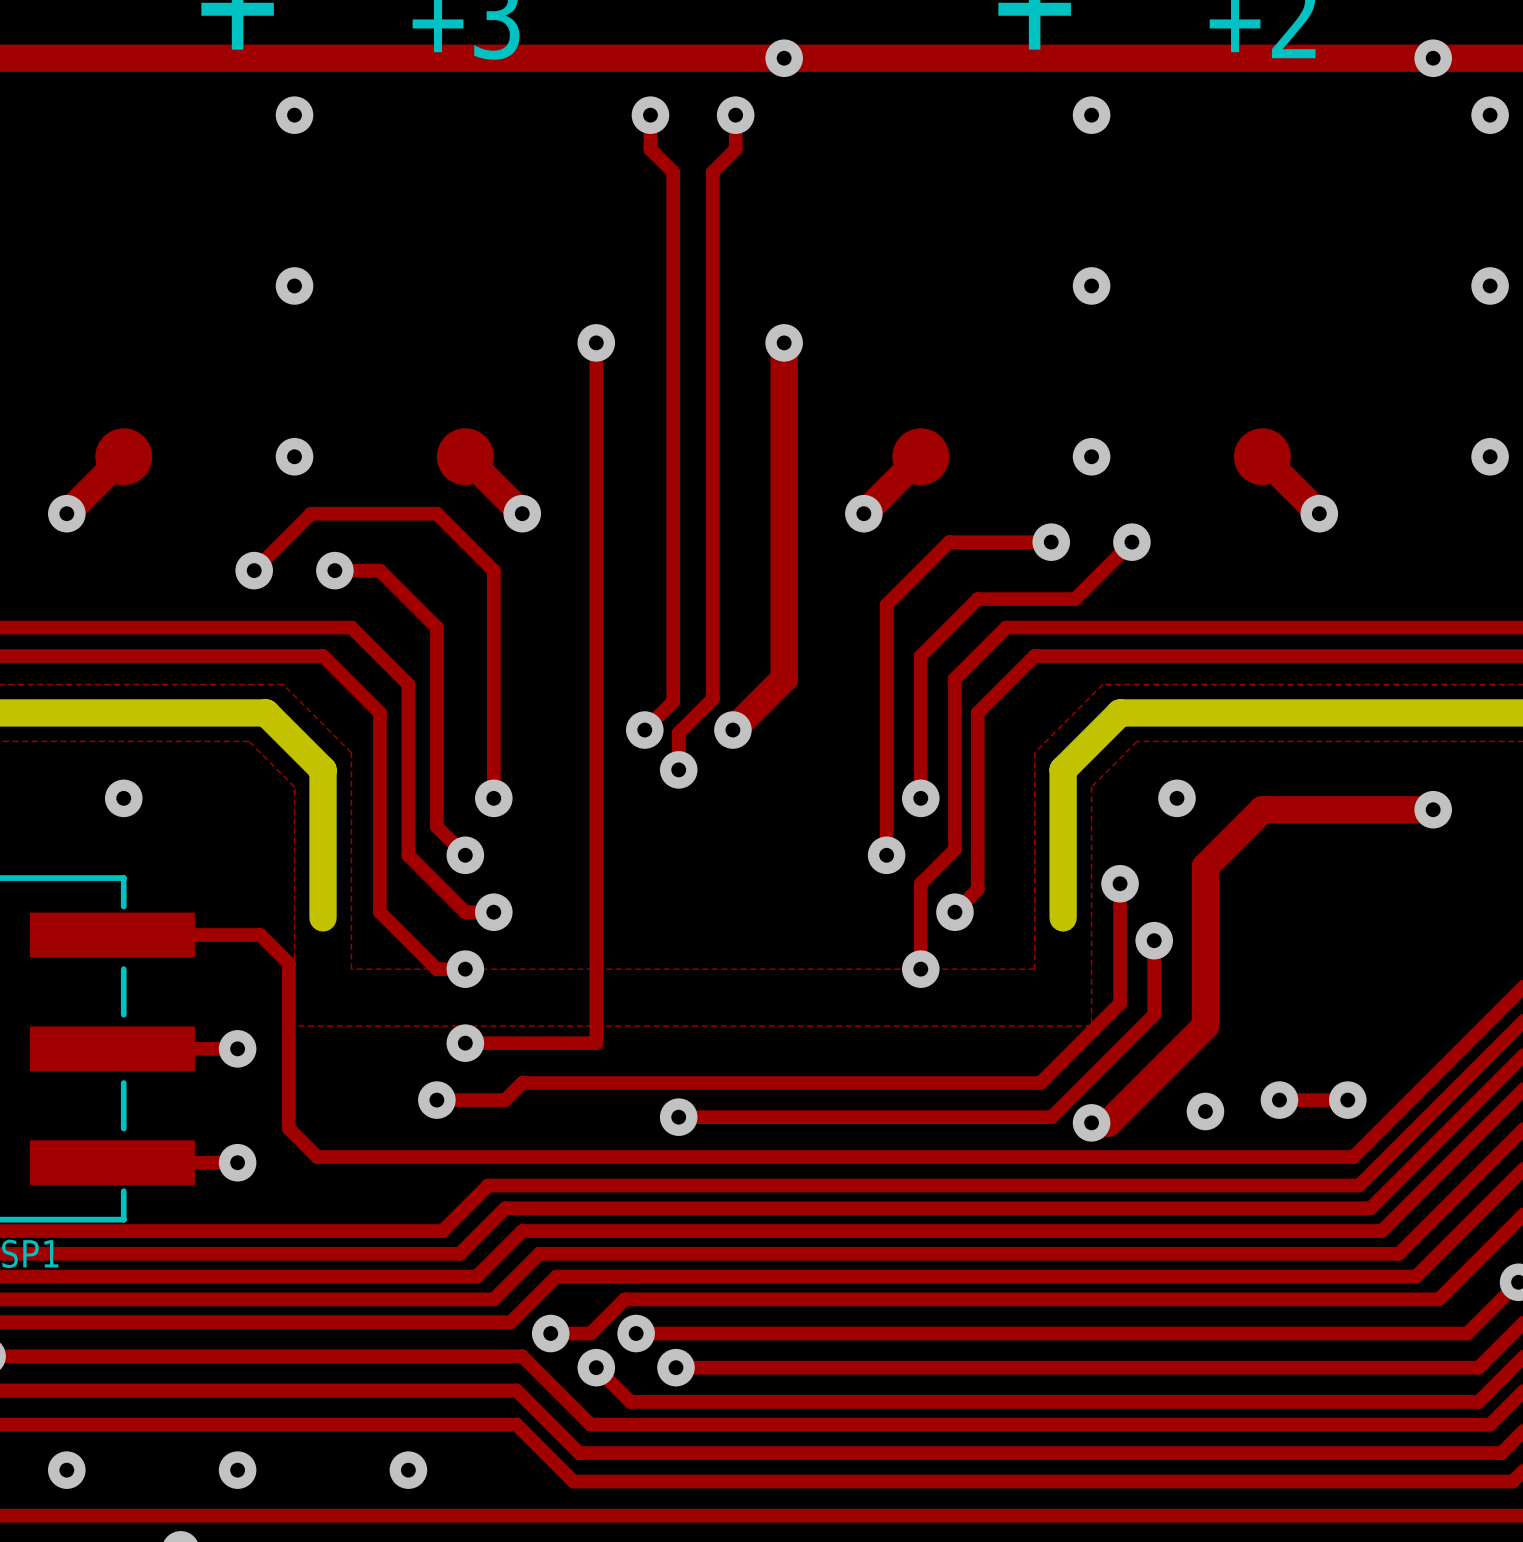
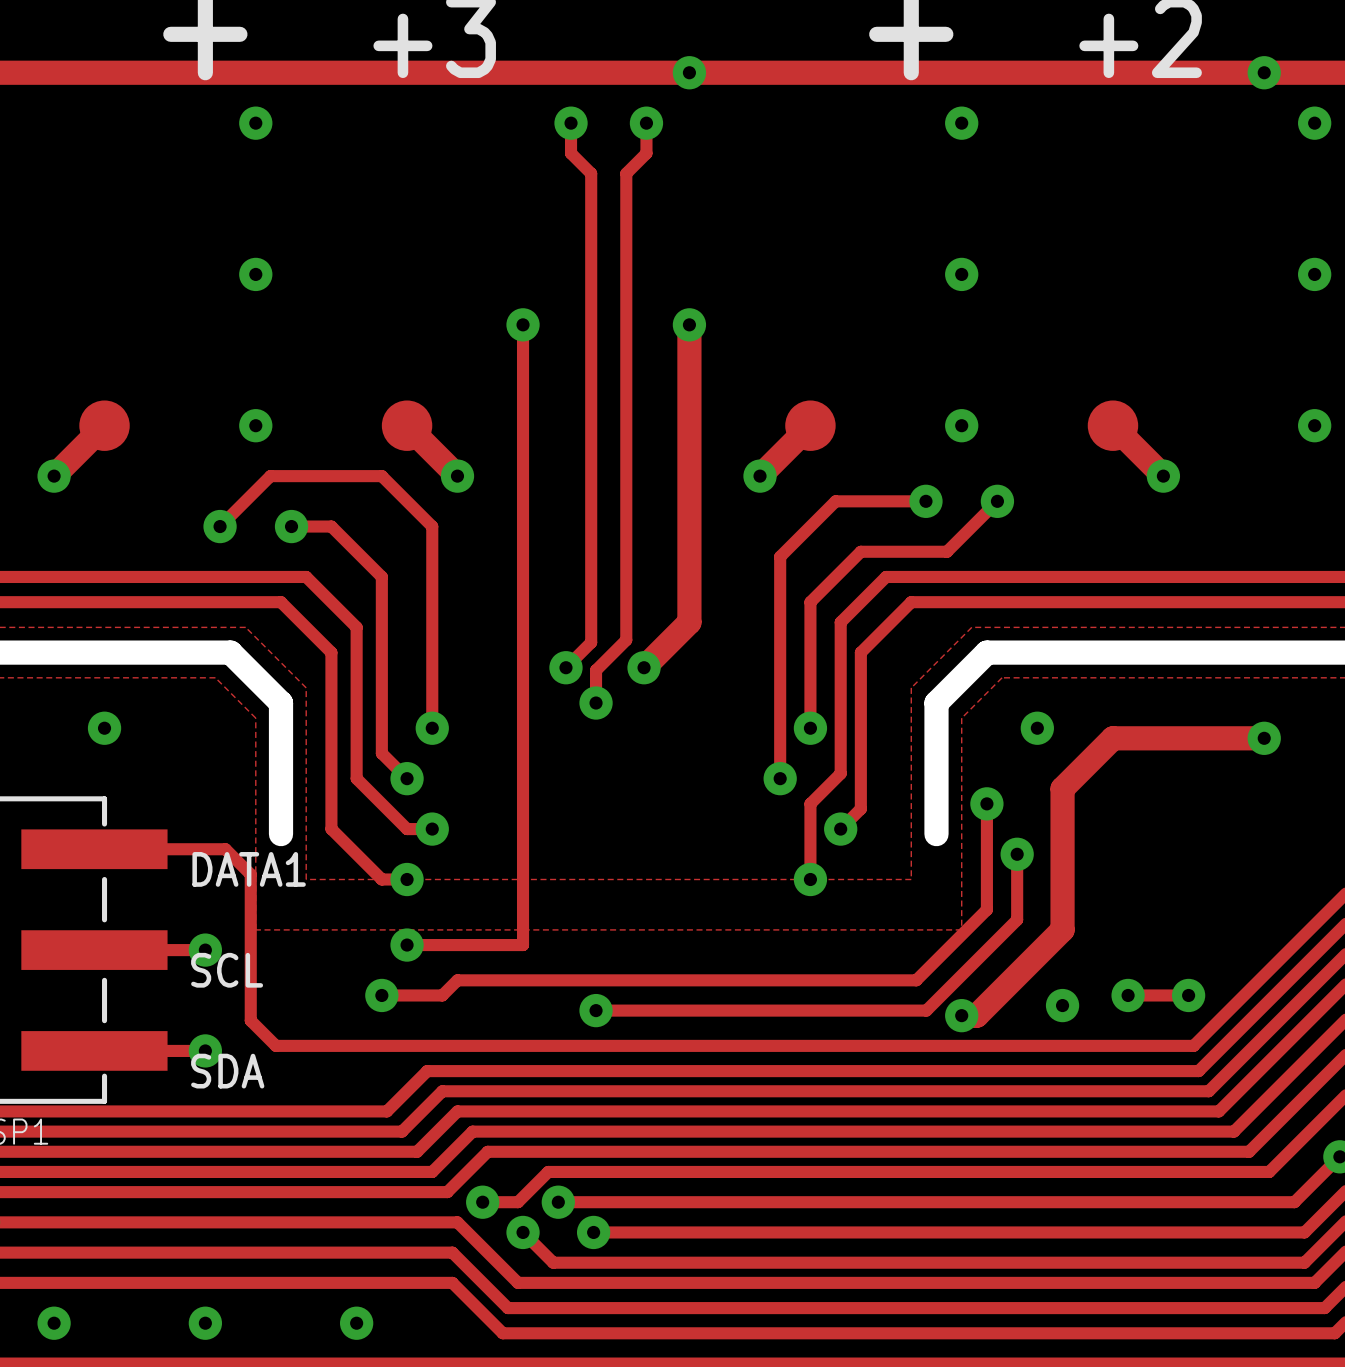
text: none -> DATA1 (249, 869)
text: none -> SCL (227, 970)
text: none -> SDA (227, 1071)

